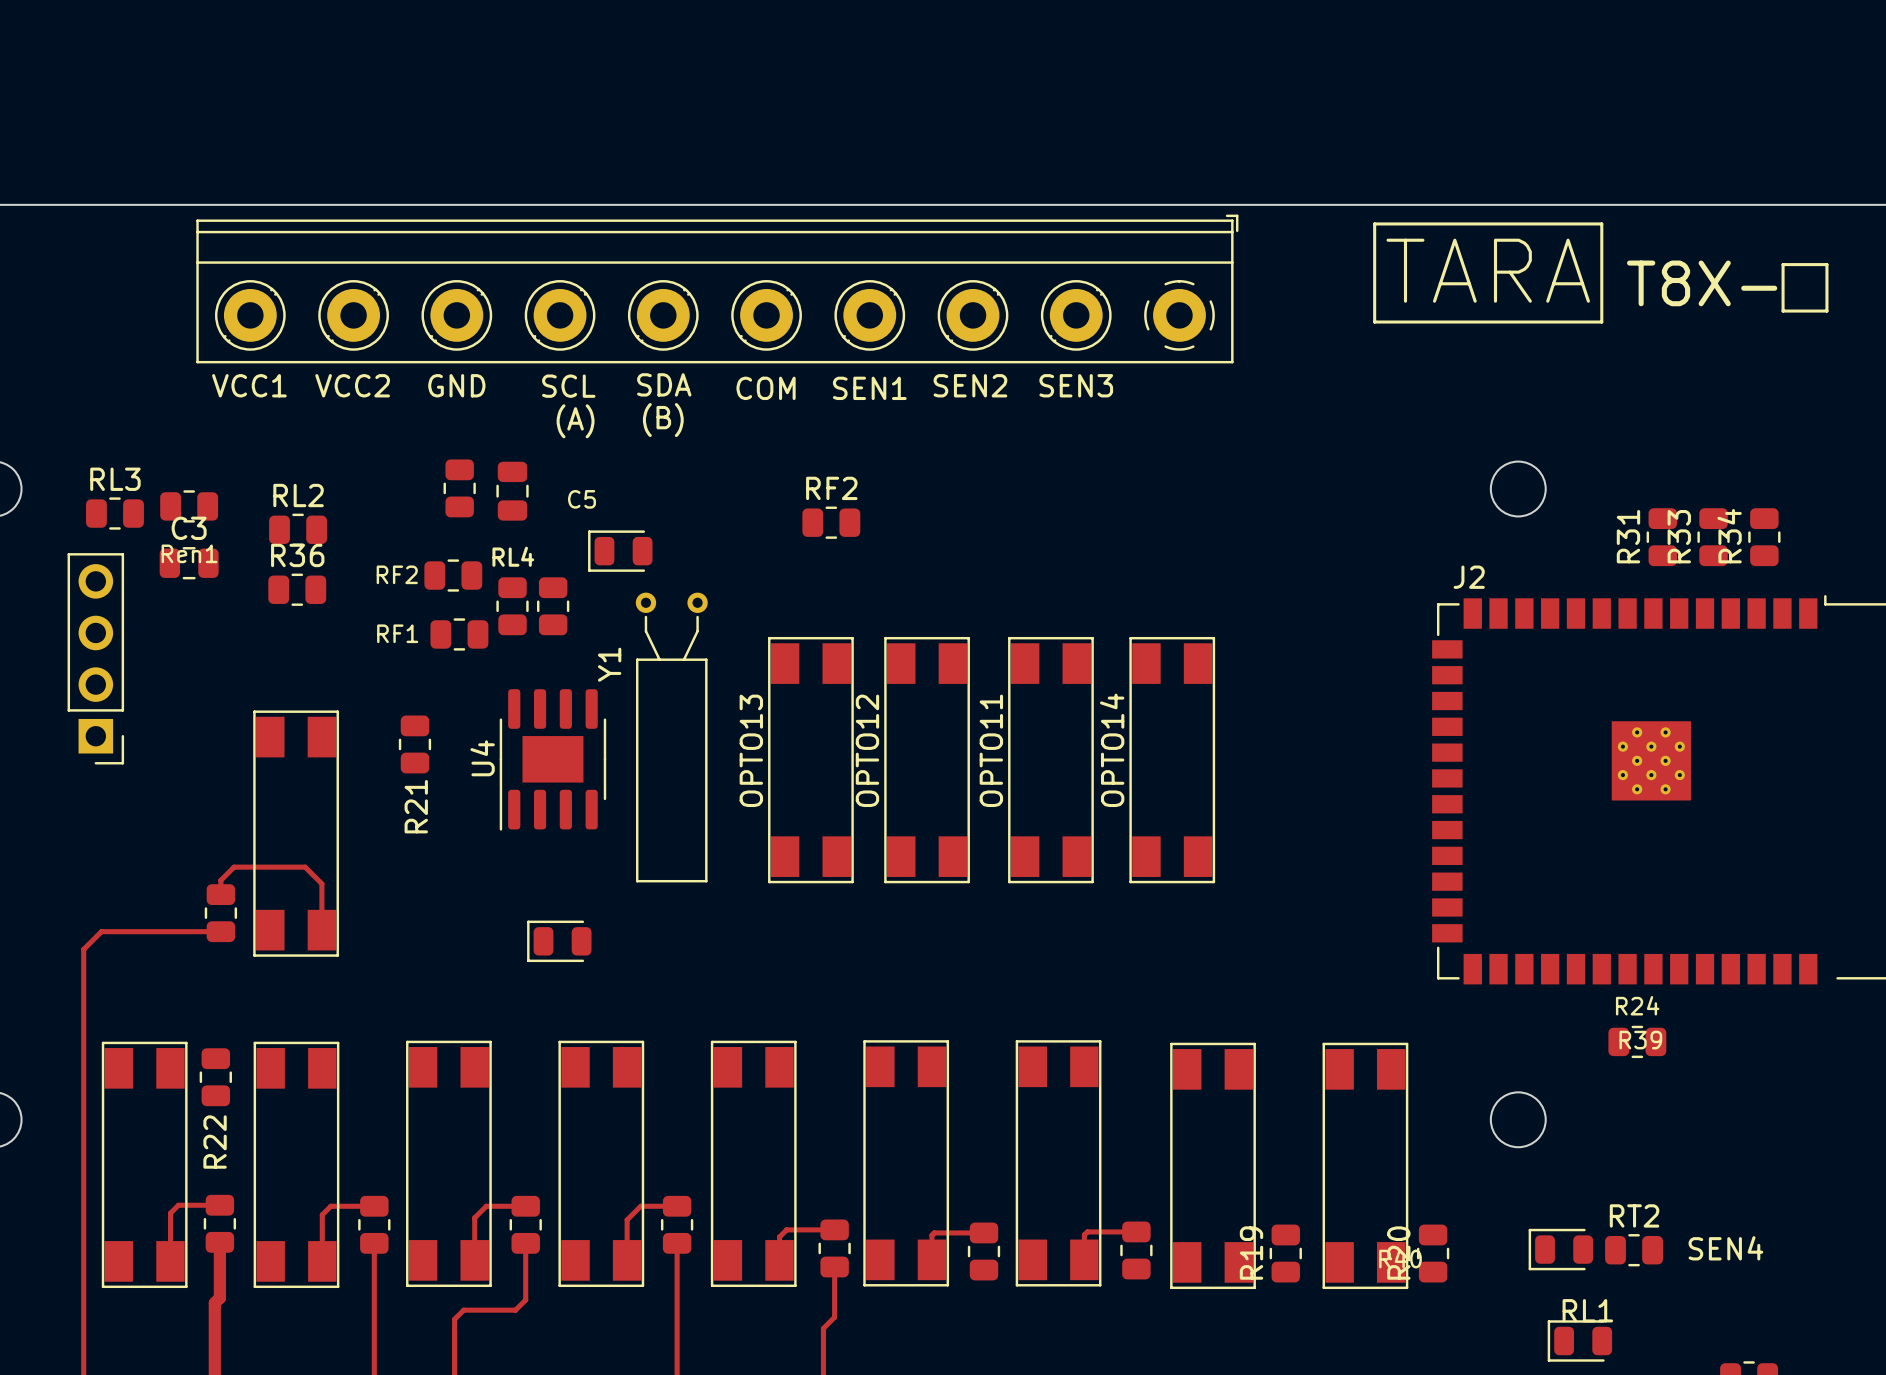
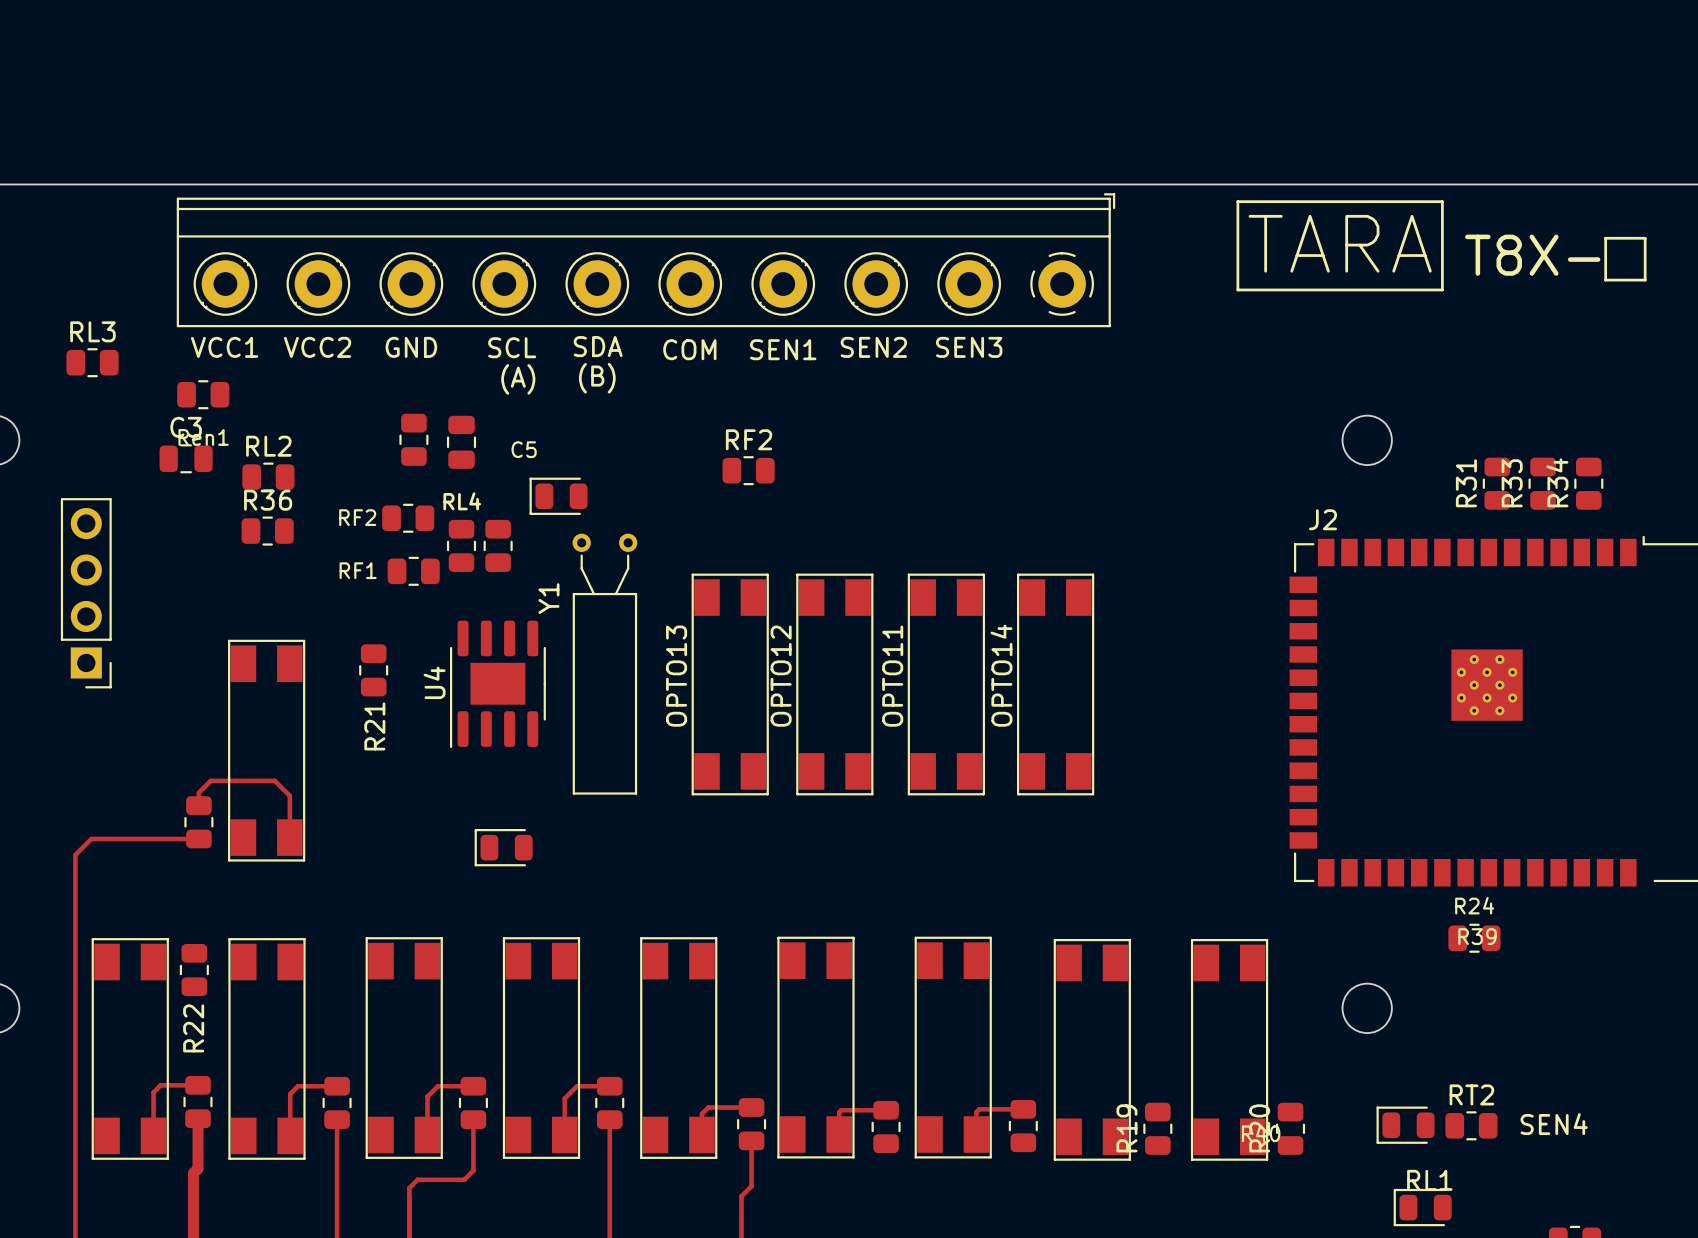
Ren1 position: (189, 506) -> (203, 394)
RL3 position: (114, 513) -> (92, 362)
C3 position: (189, 563) -> (186, 458)

